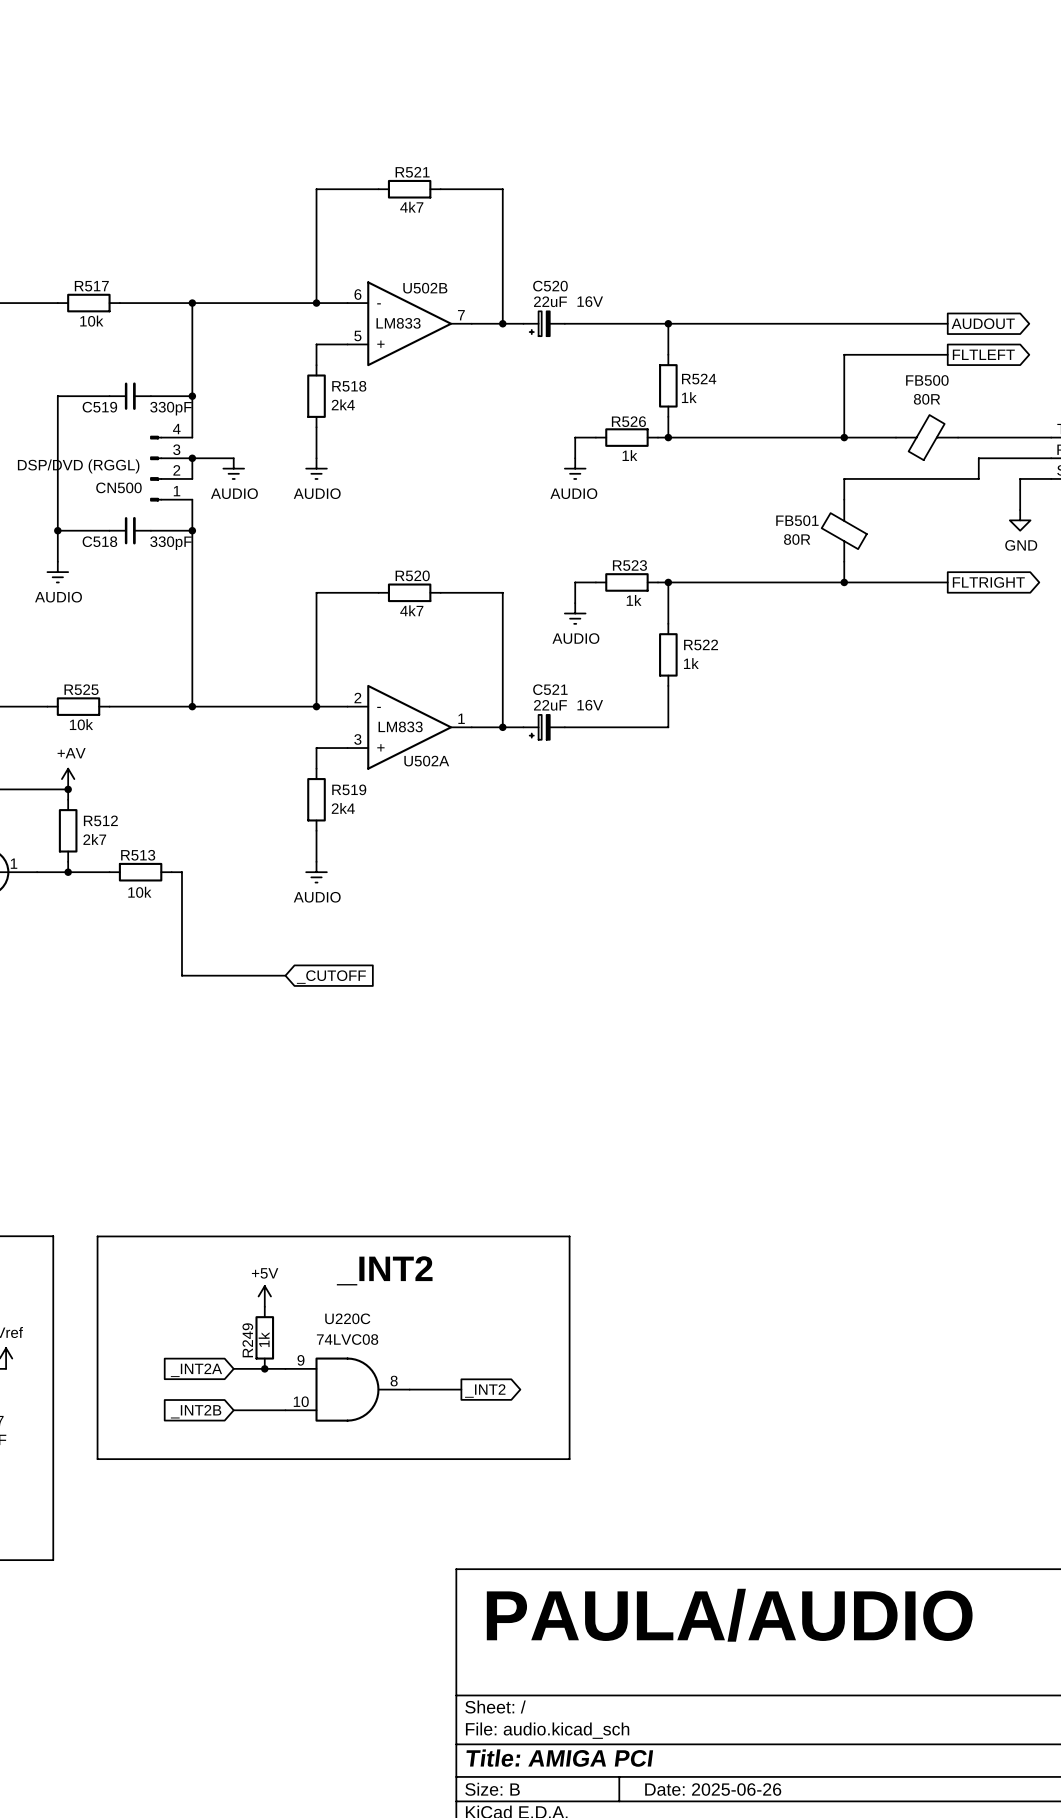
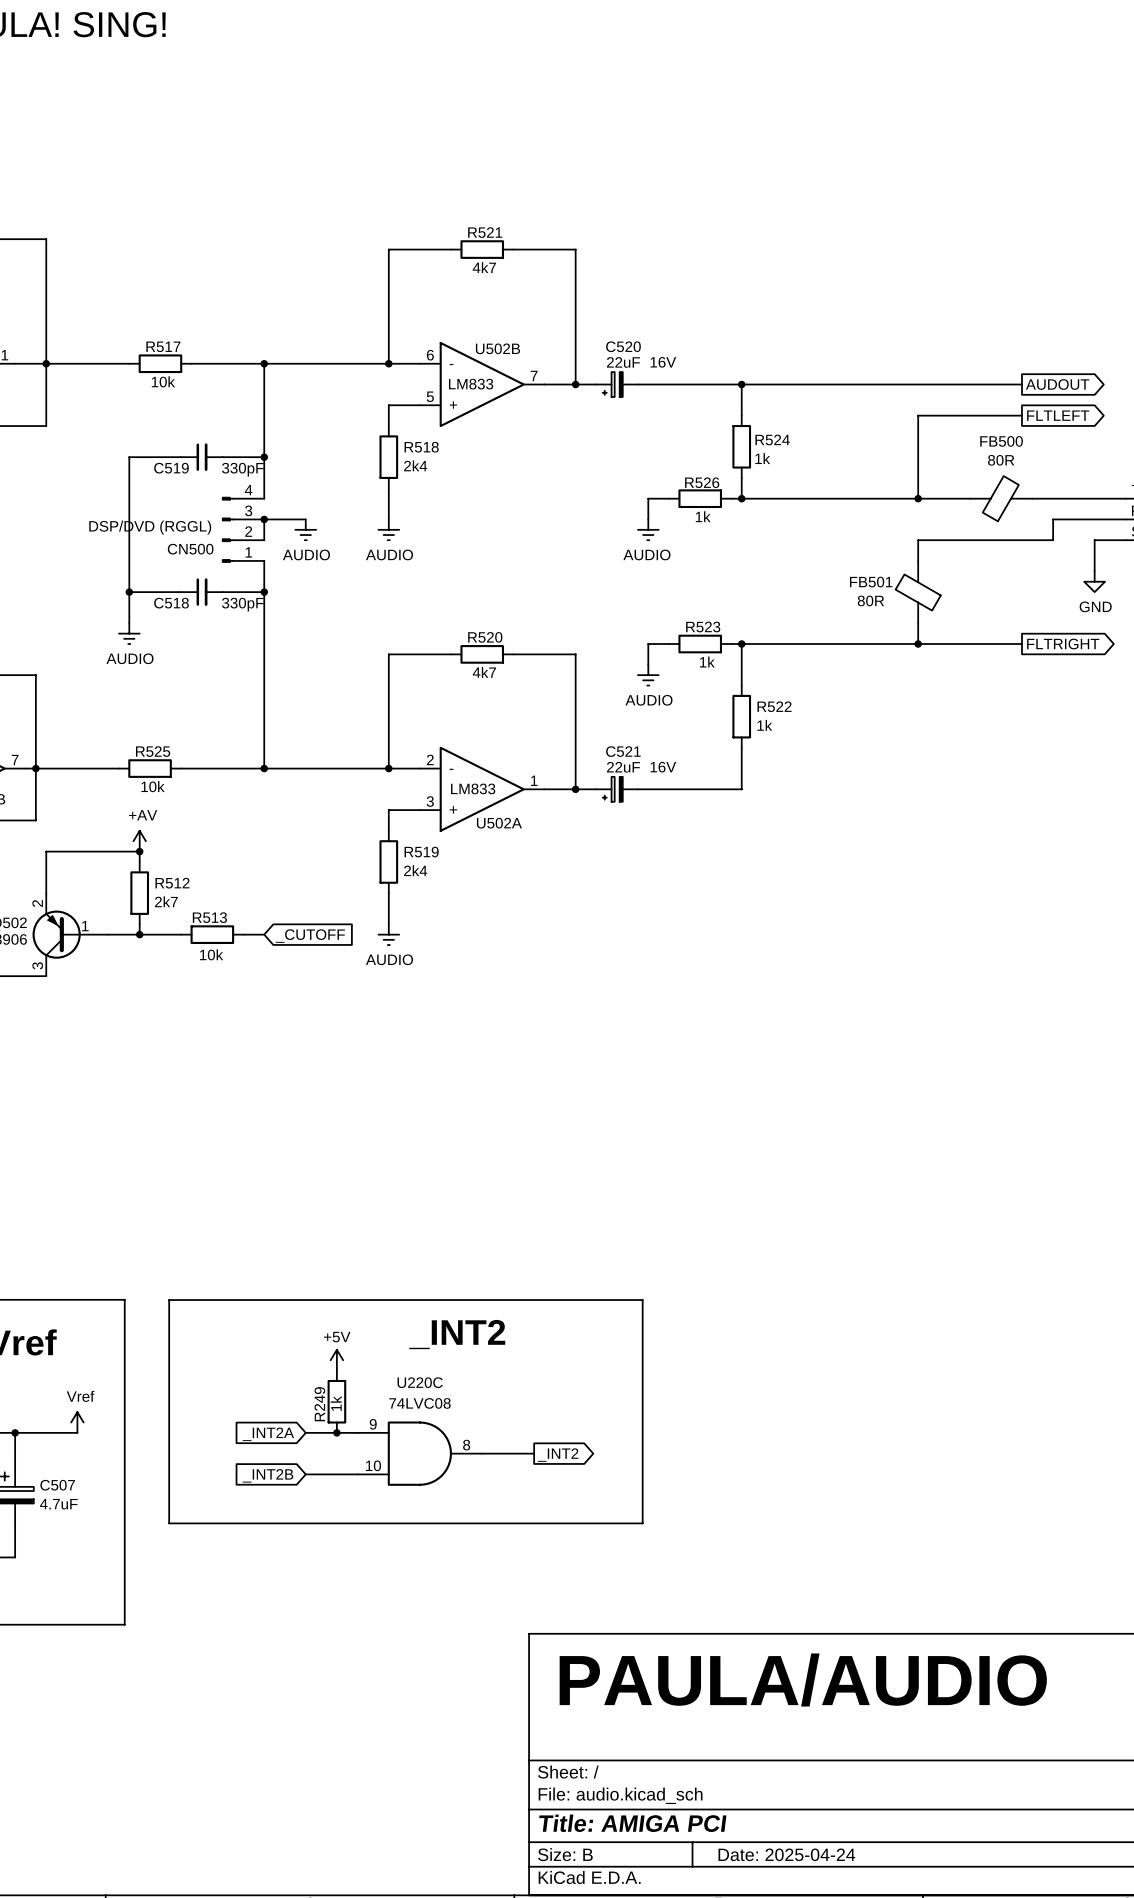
wire: (181, 872) (181, 975) (285, 975) -> (253, 934) (264, 934)
global label position: _CUTOFF (331, 977) -> _CUTOFF (310, 936)
title block: Date: 2025-06-26 (713, 1789) -> Date: 2025-04-24 (786, 1854)

